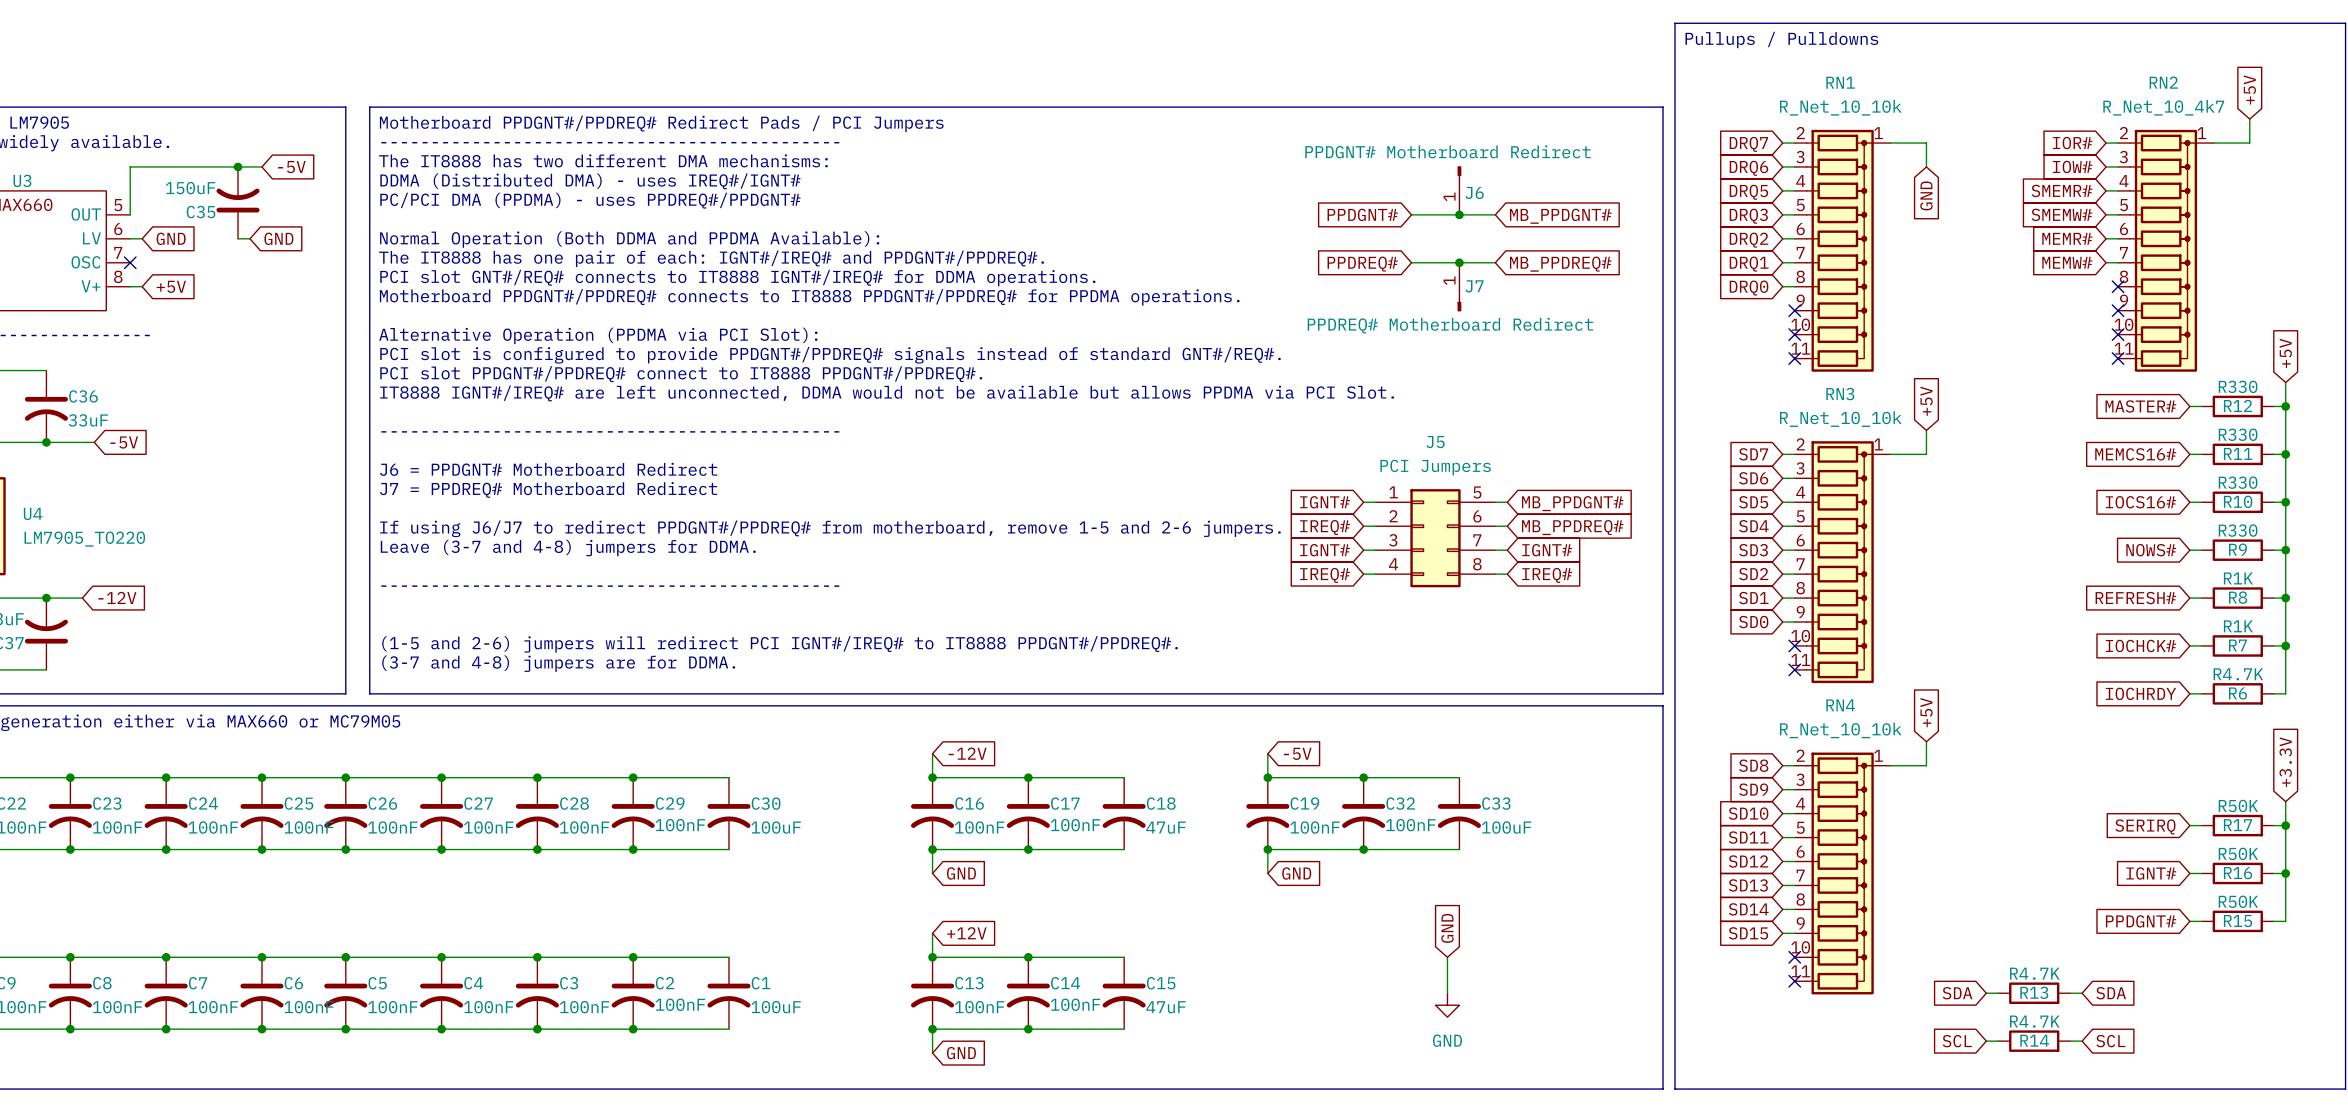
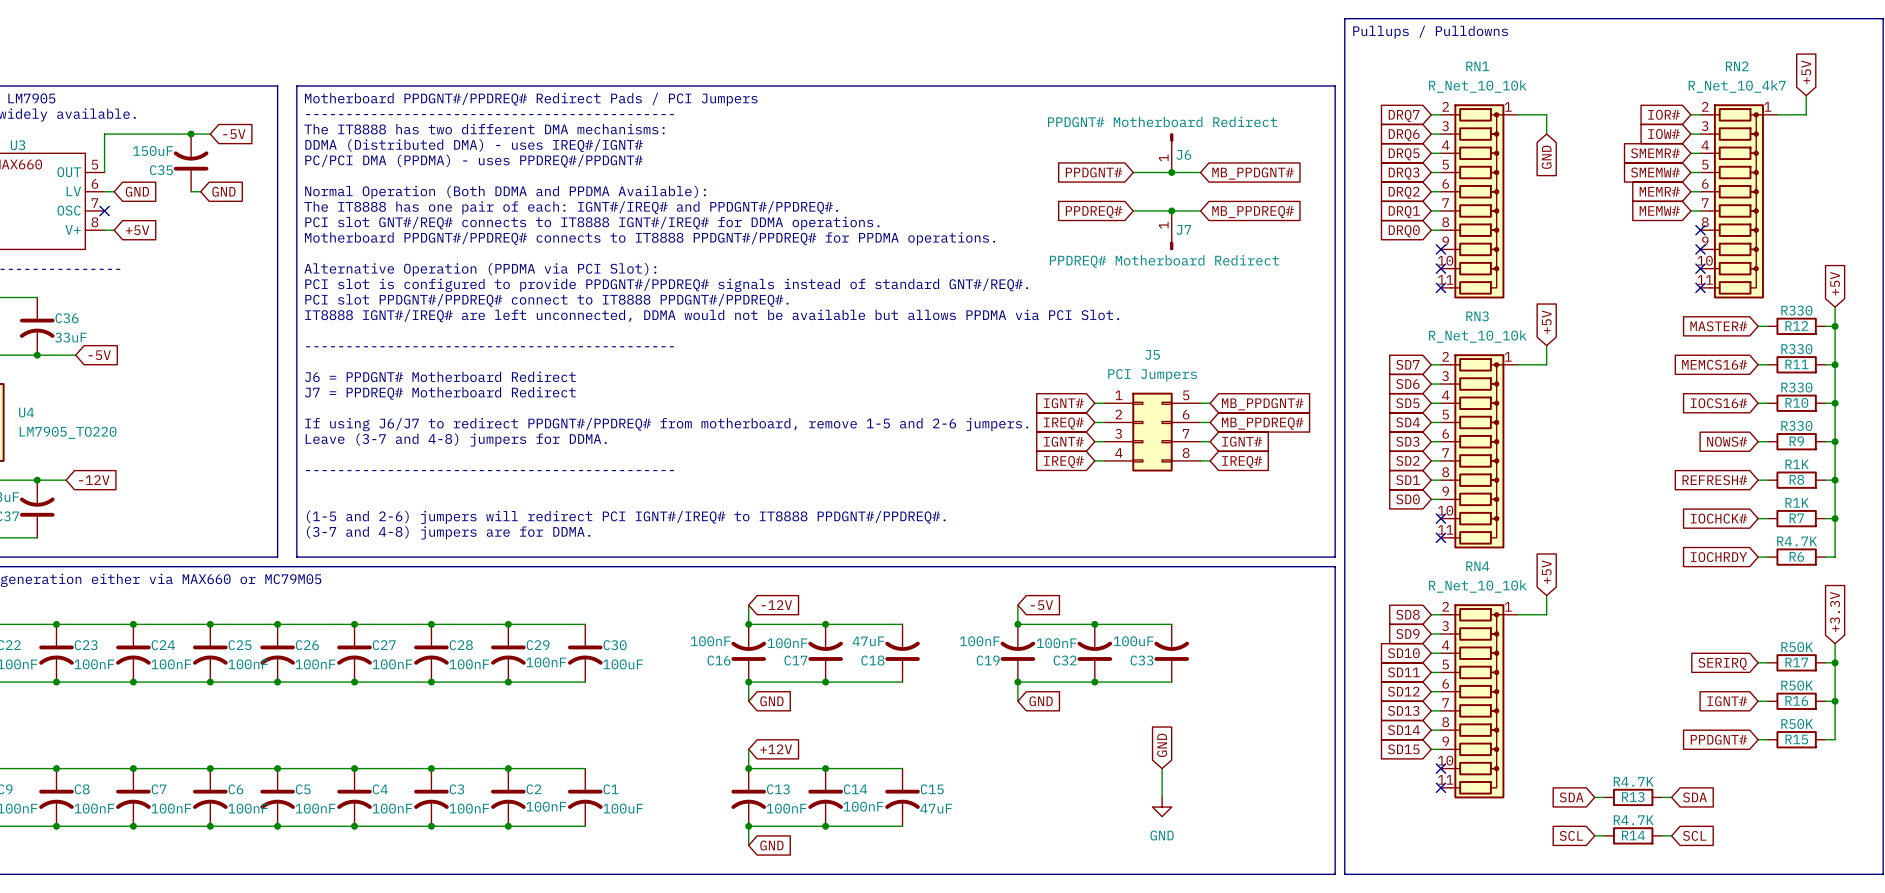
C16 rotation: 0° (932, 816) -> 180° (748, 651)
C17 rotation: 0° (1028, 816) -> 180° (825, 651)
C18 rotation: 0° (1124, 816) -> 180° (902, 651)
C19 rotation: 0° (1267, 816) -> 180° (1017, 651)
C32 rotation: 0° (1363, 816) -> 180° (1094, 651)
C33 rotation: 0° (1459, 816) -> 180° (1171, 651)

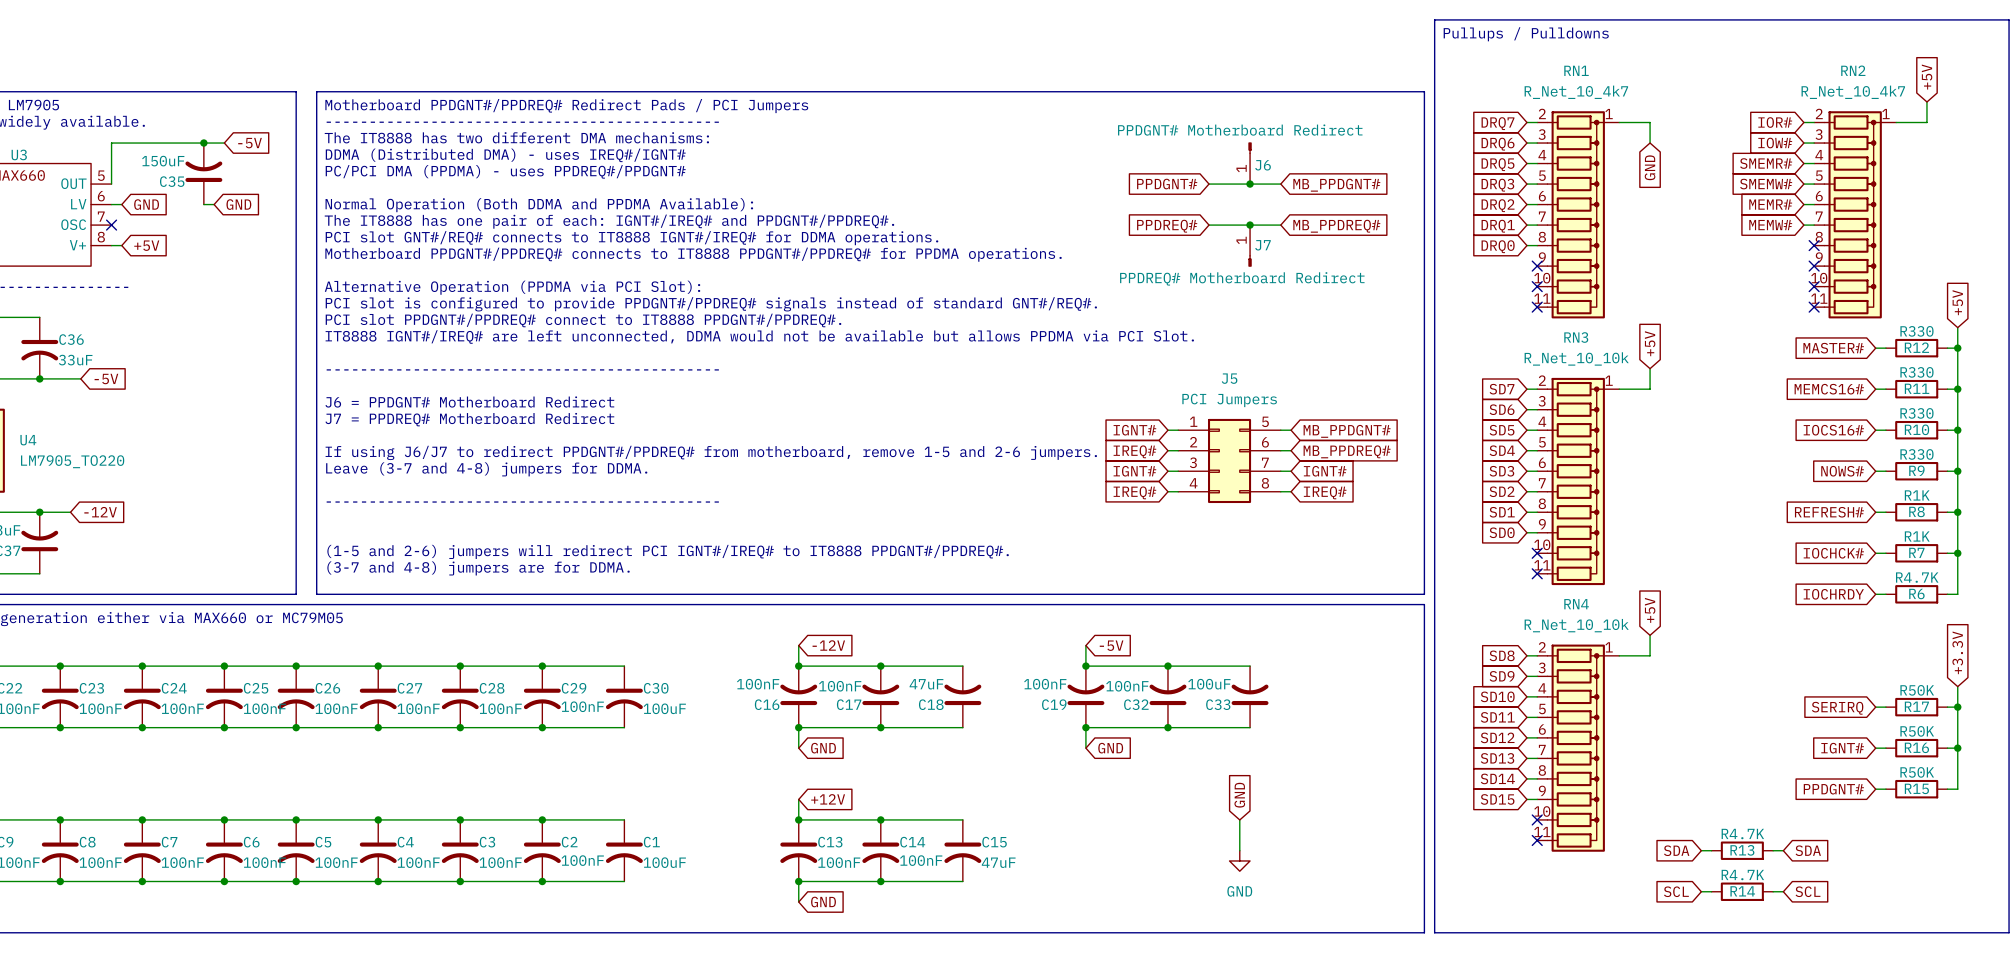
RN1 value: R_Net_10_10k (1477, 86) -> R_Net_10_4k7 (1576, 92)

